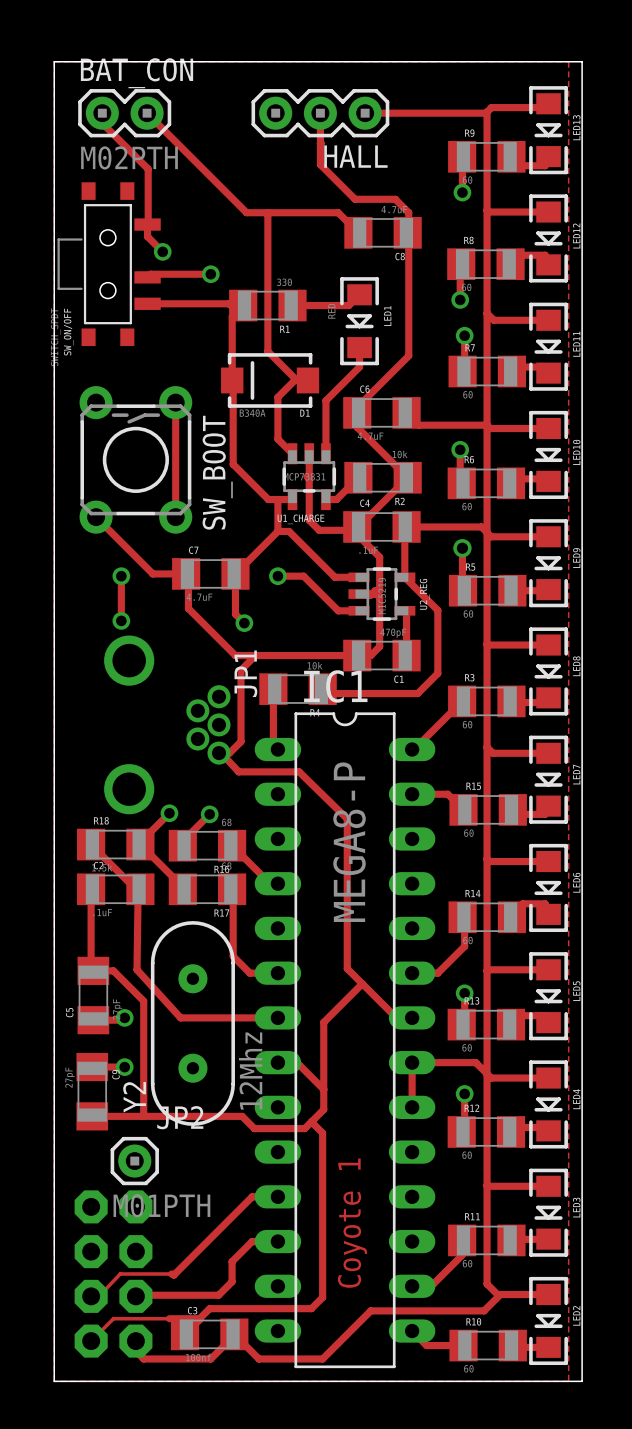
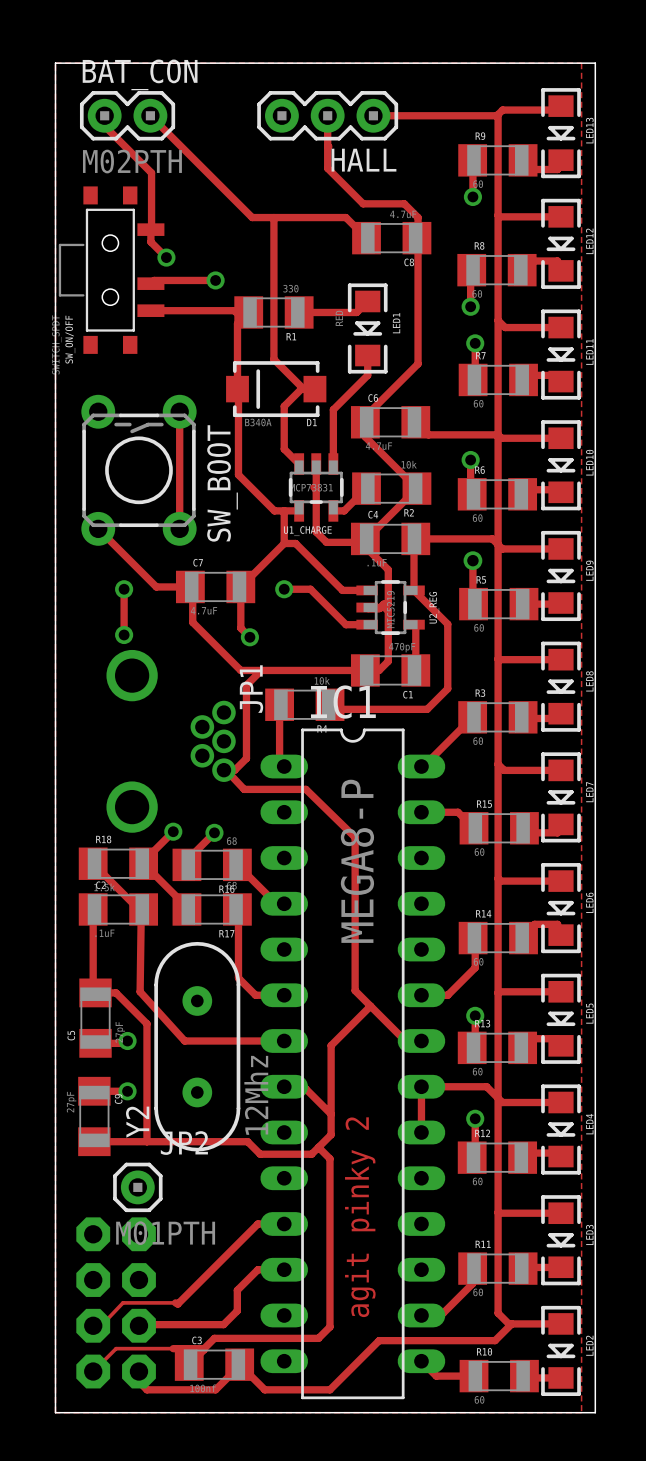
text: Coyote 1 (352, 1223) -> agit pinky 2 (360, 1217)

